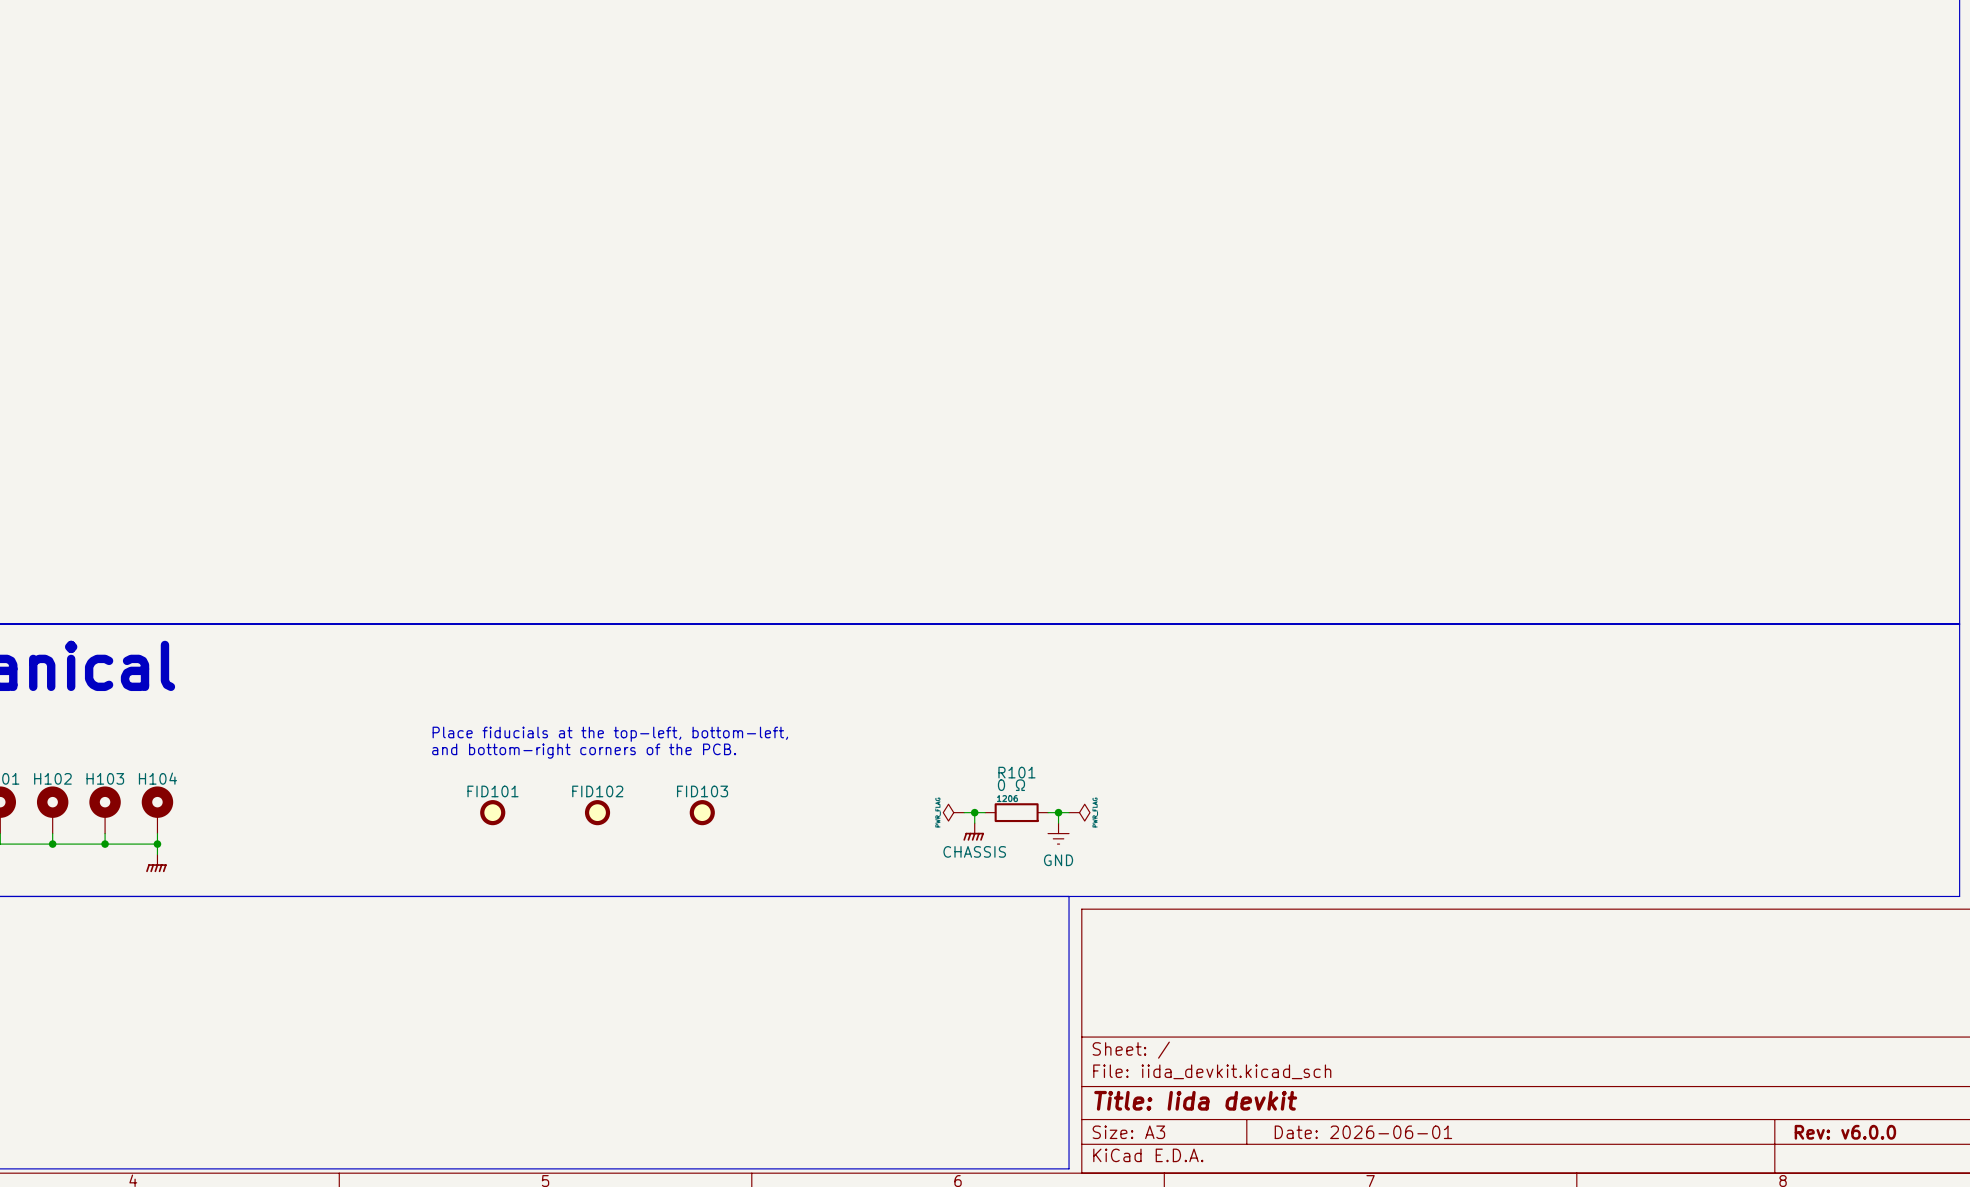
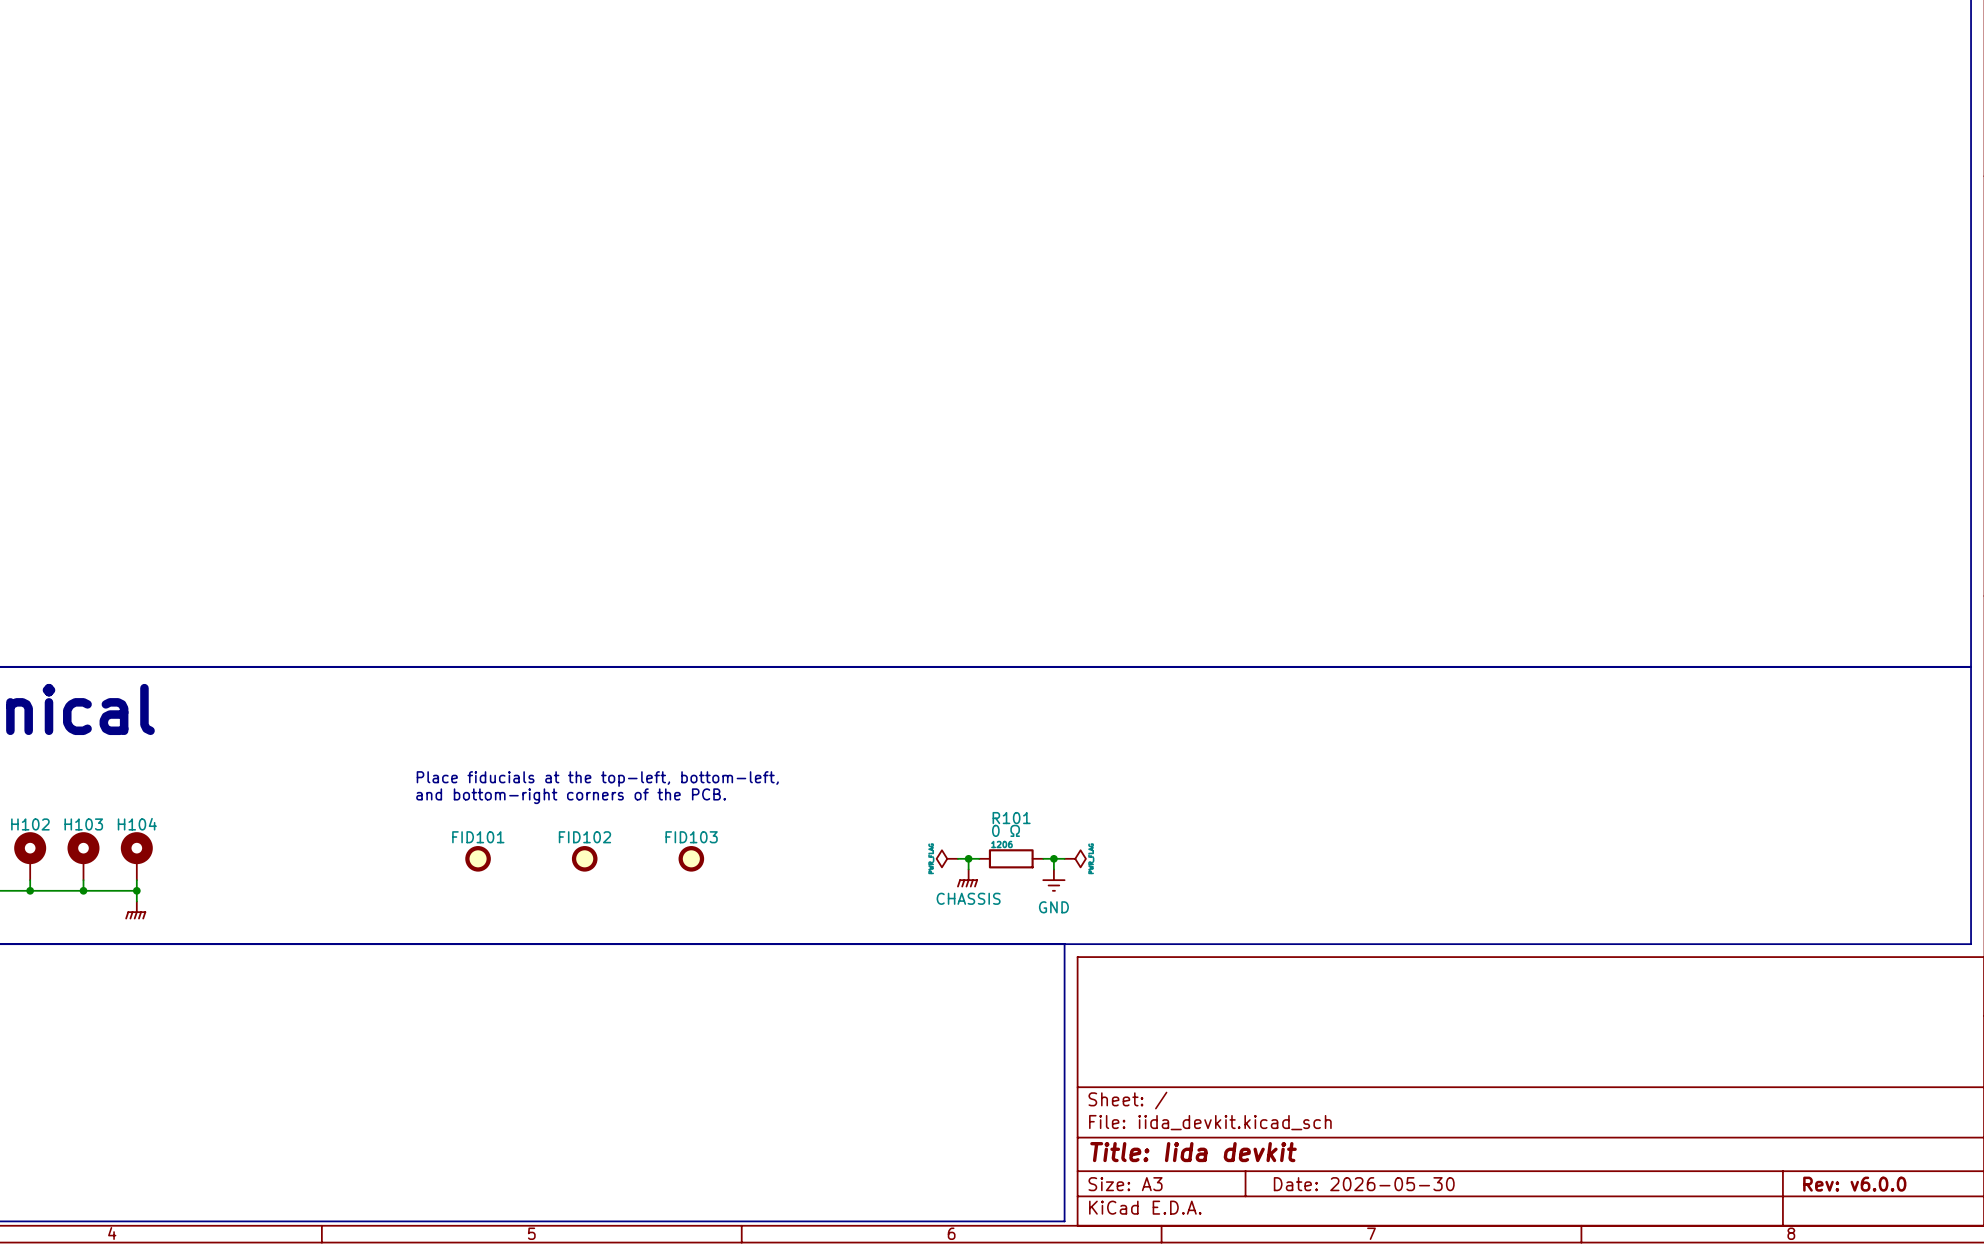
title block: Date: 2026-06-01 (1363, 1132) -> Date: 2026-05-30 (1364, 1184)

